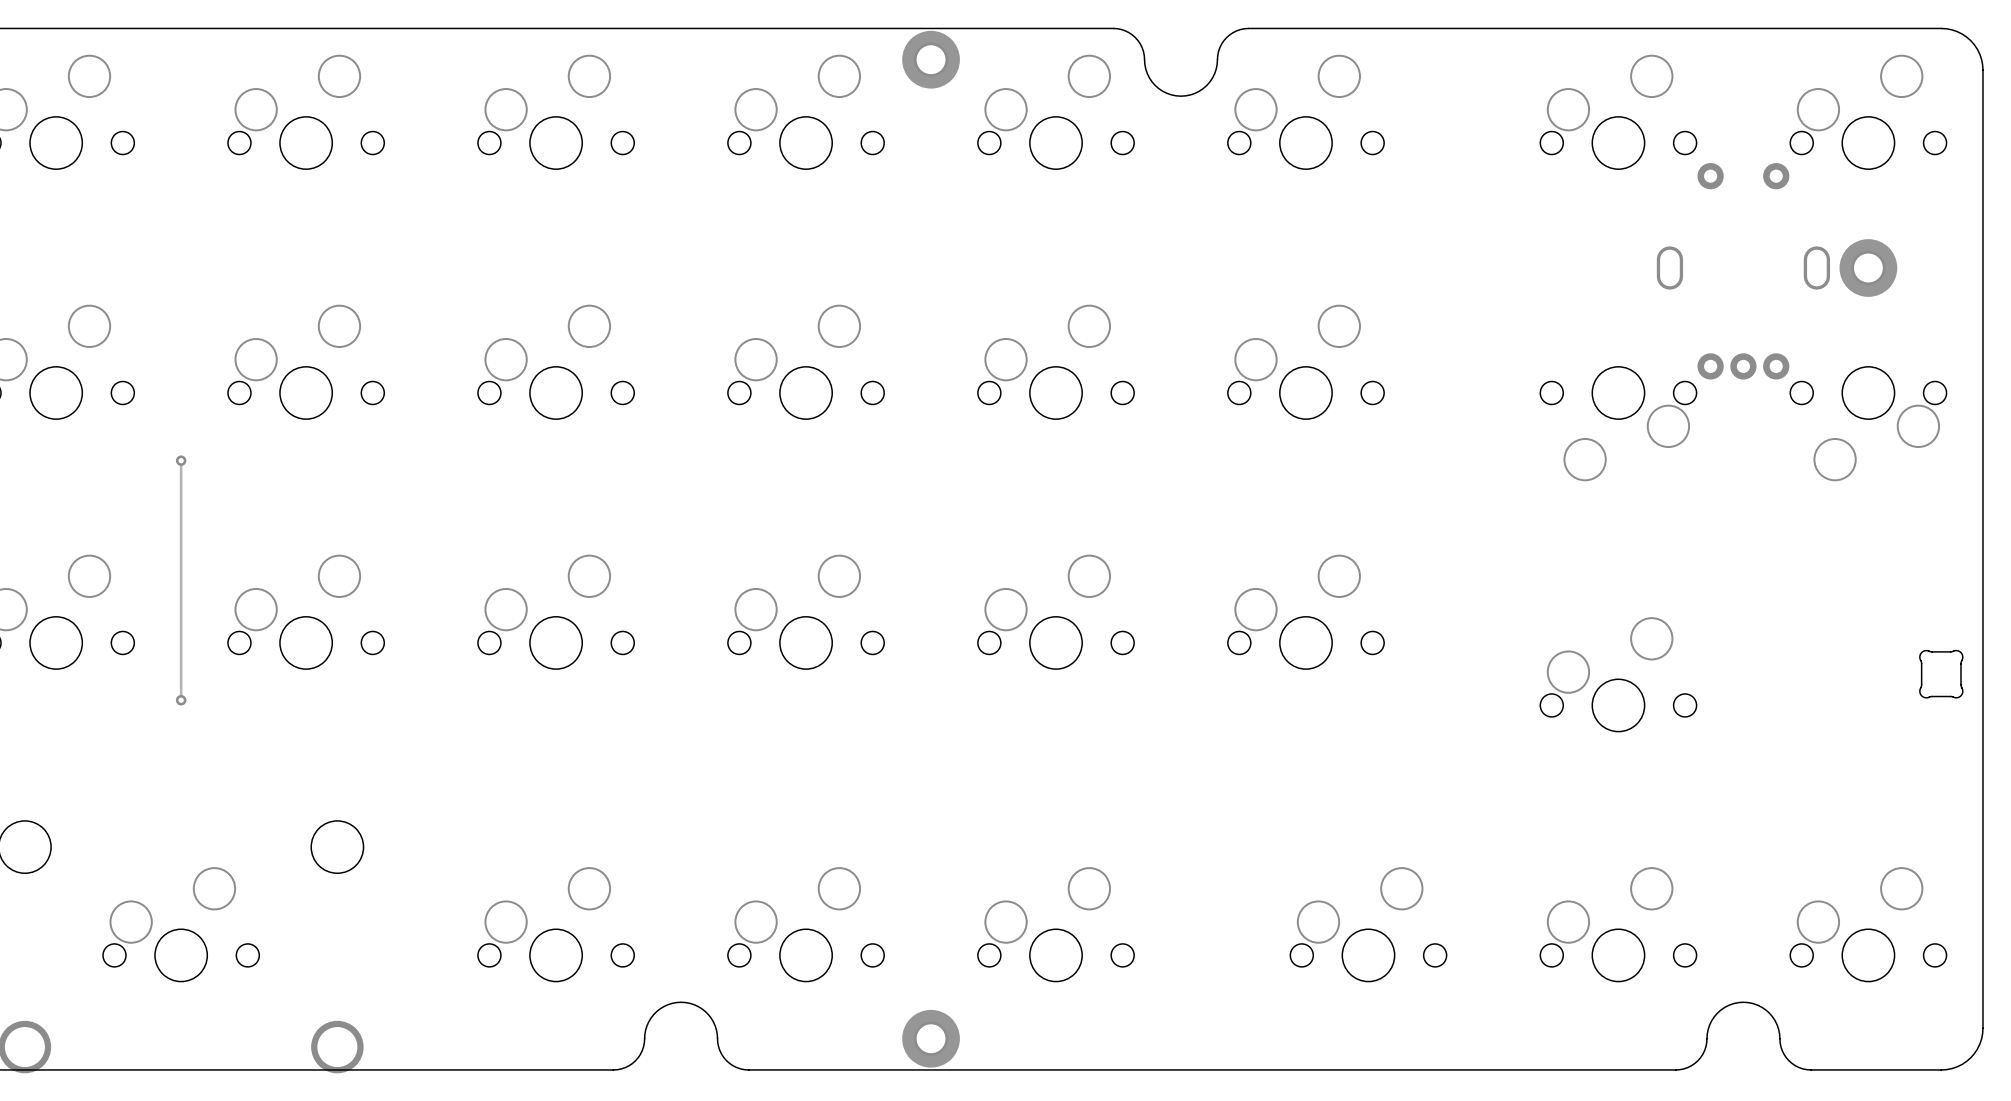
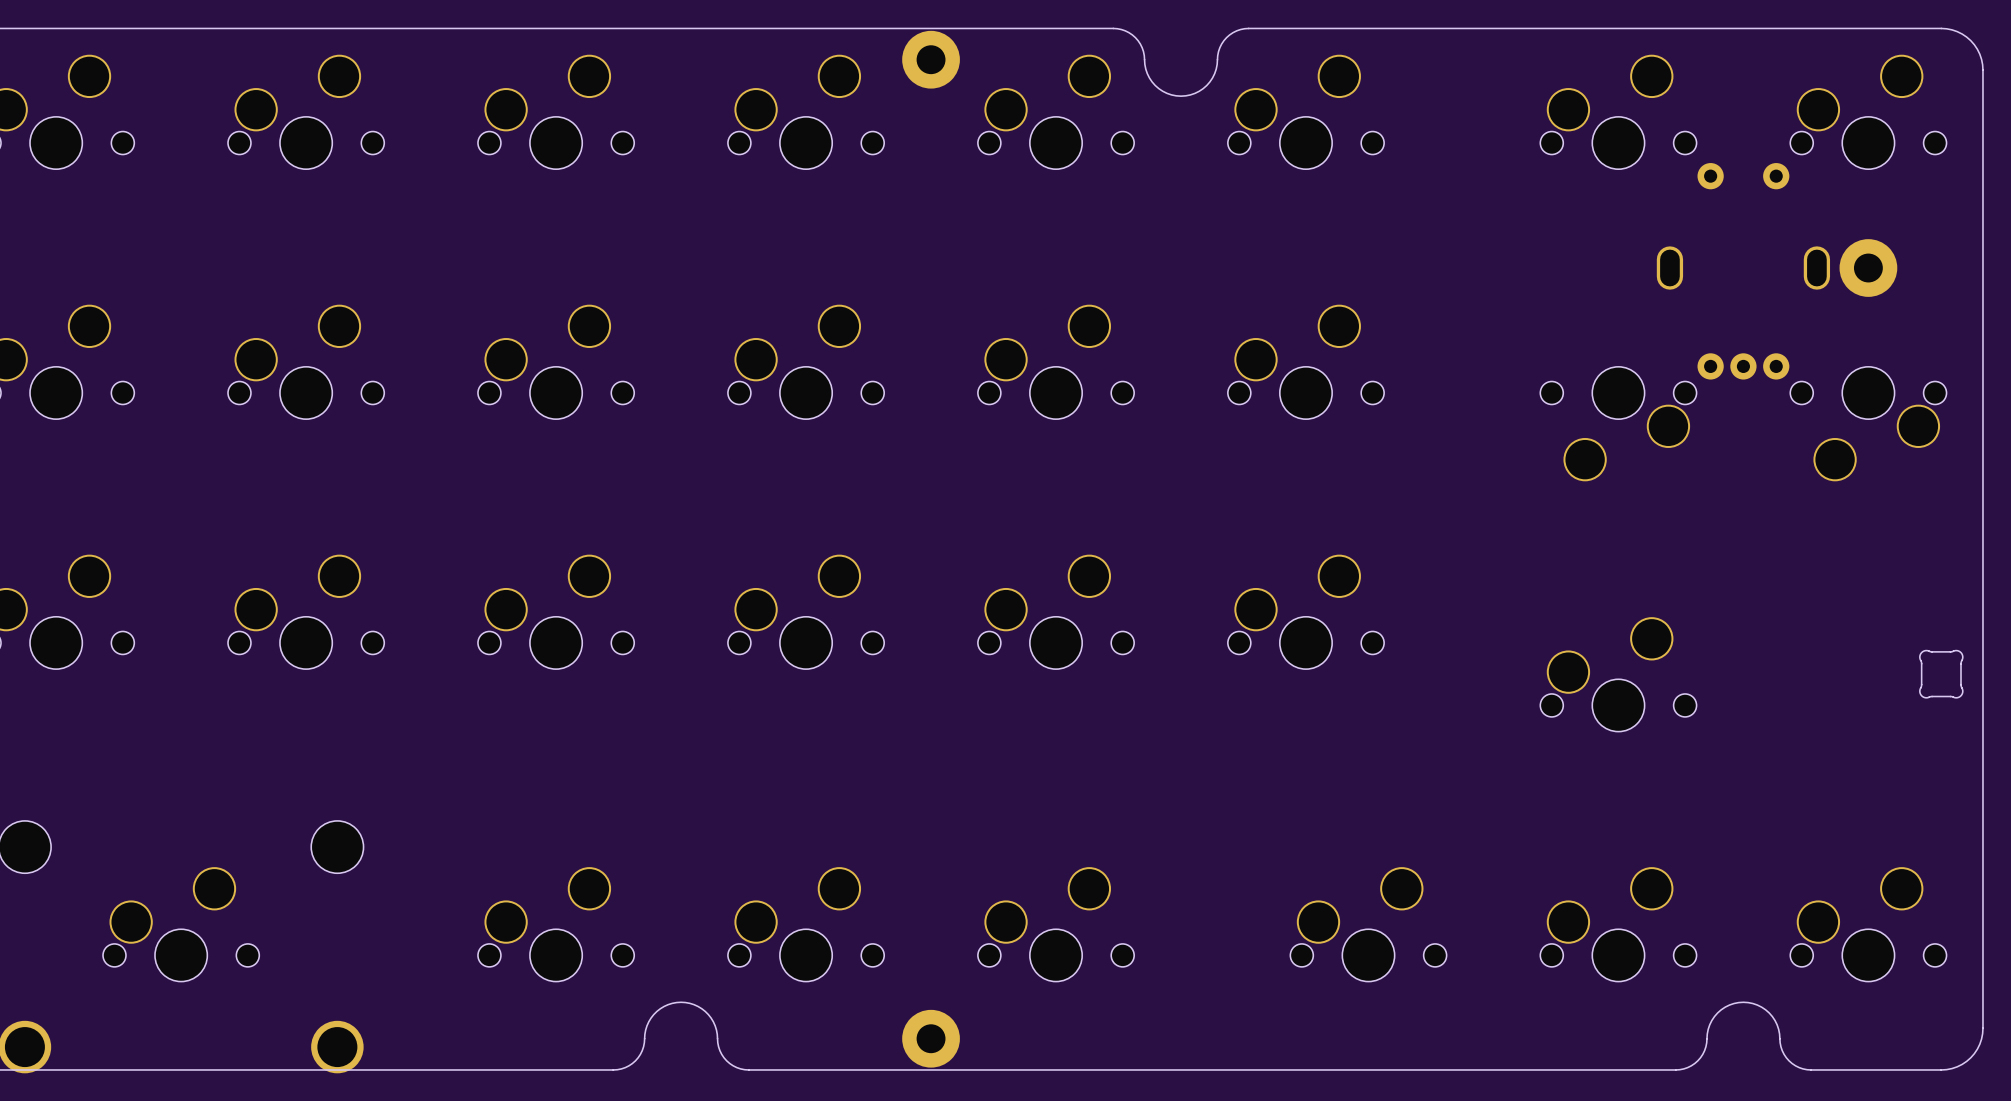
track: (181, 460) (181, 700) -> none
via: (181, 460) -> none
via: (181, 700) -> none

